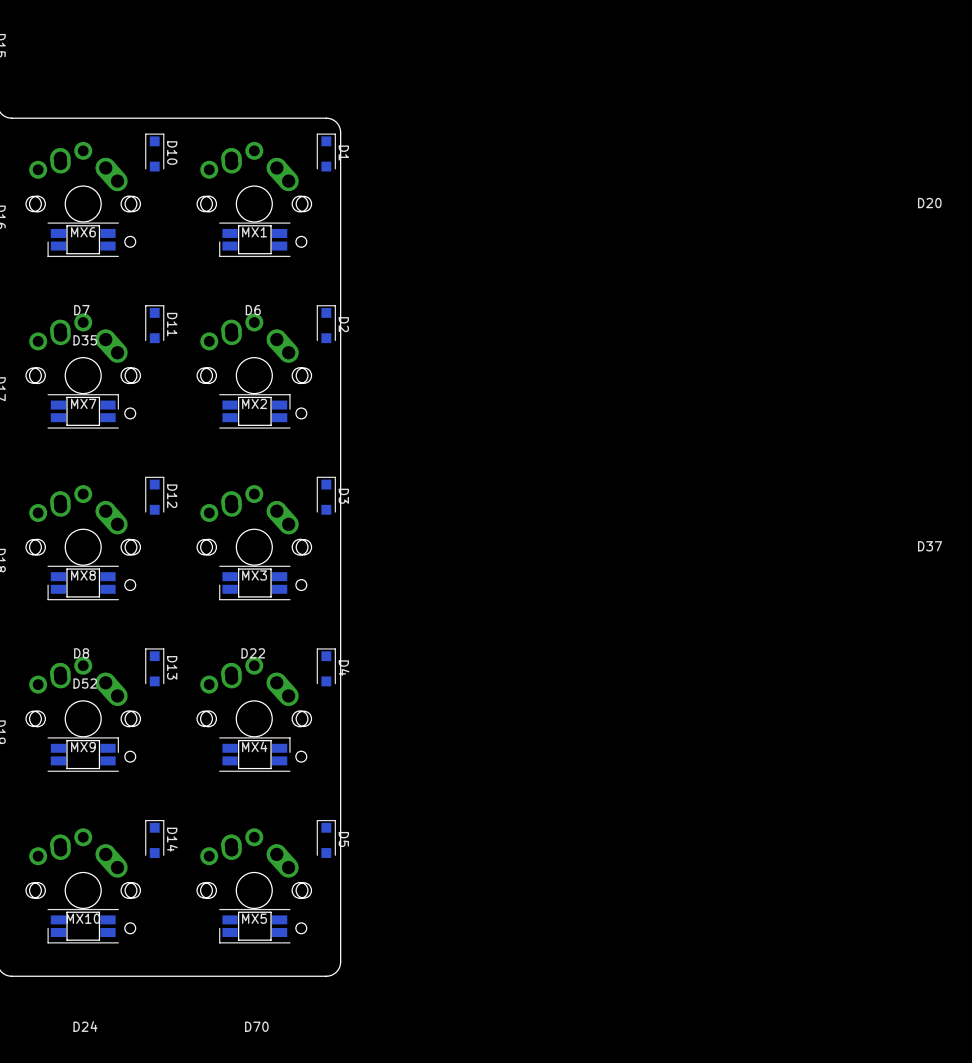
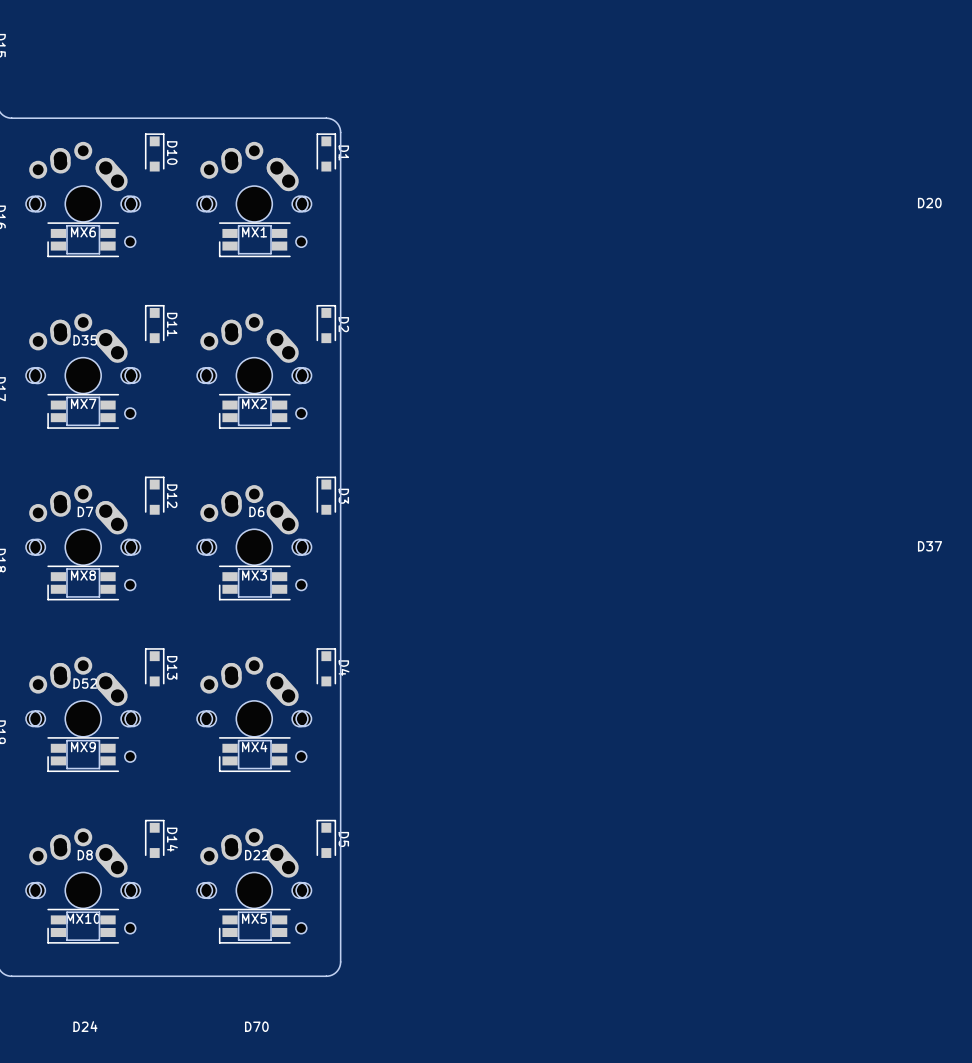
D7 rotation: 0° (83, 411) -> 180° (83, 411)
D6 rotation: 0° (254, 411) -> 180° (254, 411)
D8 rotation: 0° (83, 754) -> 180° (83, 754)
D22 rotation: 0° (254, 754) -> 180° (254, 754)

